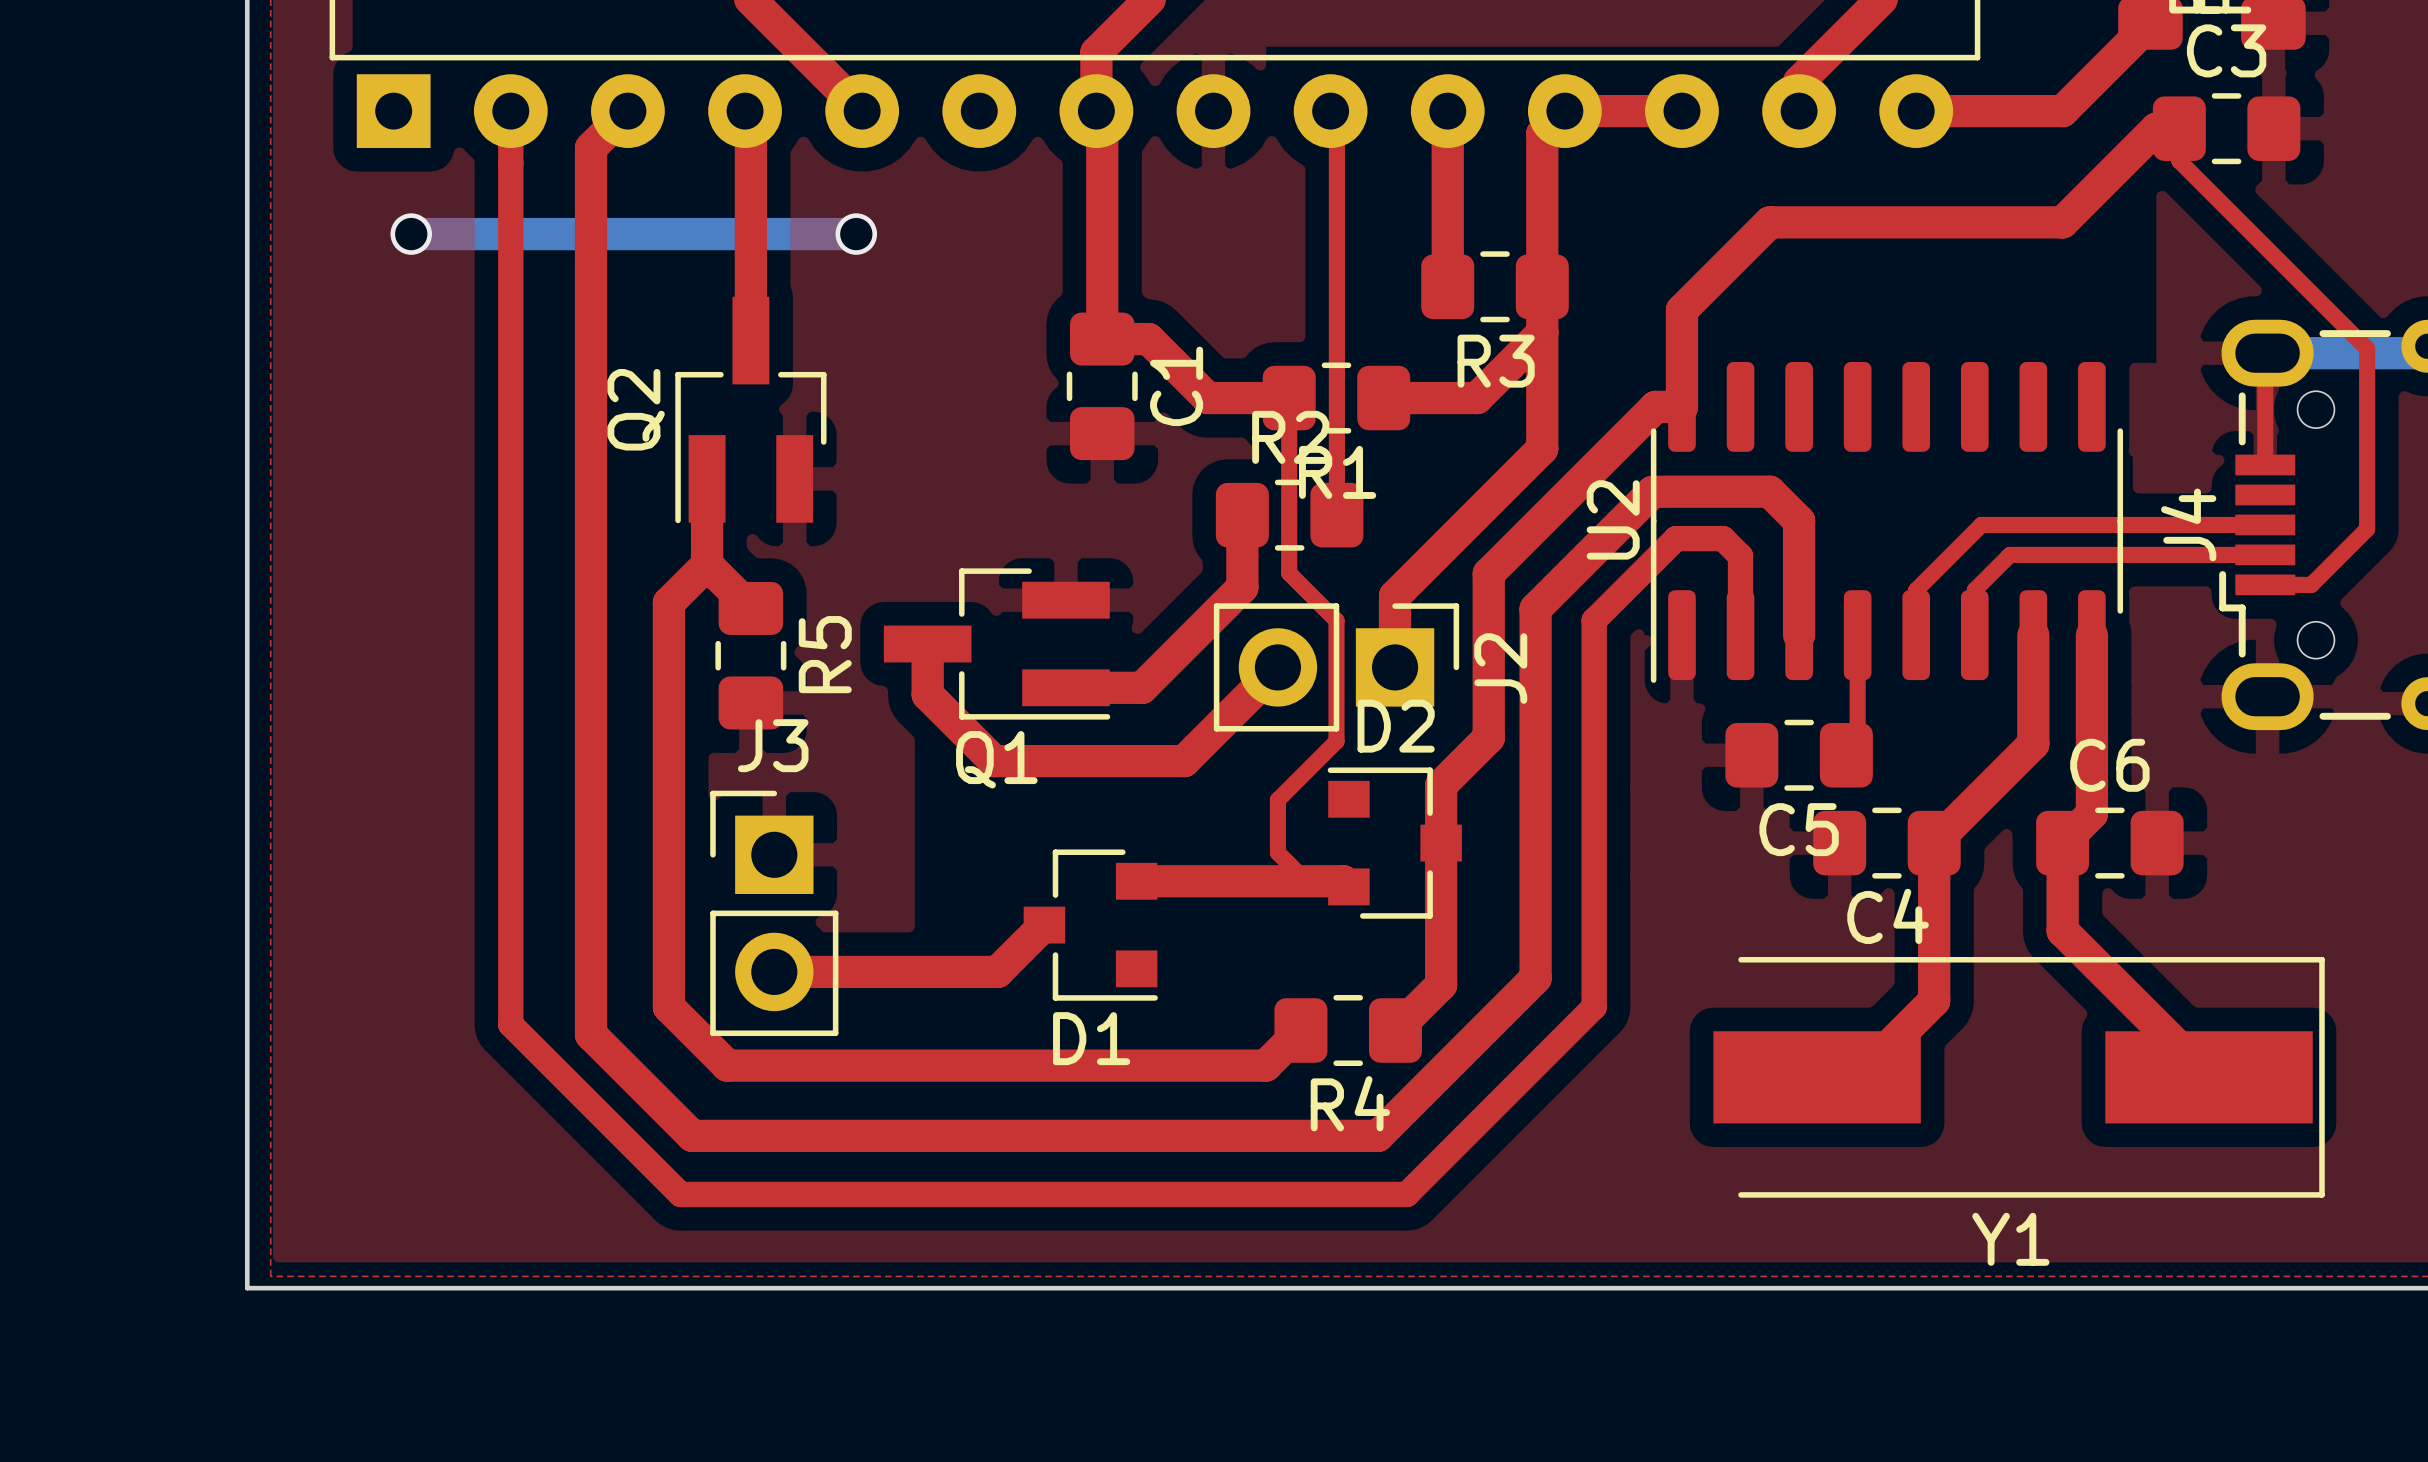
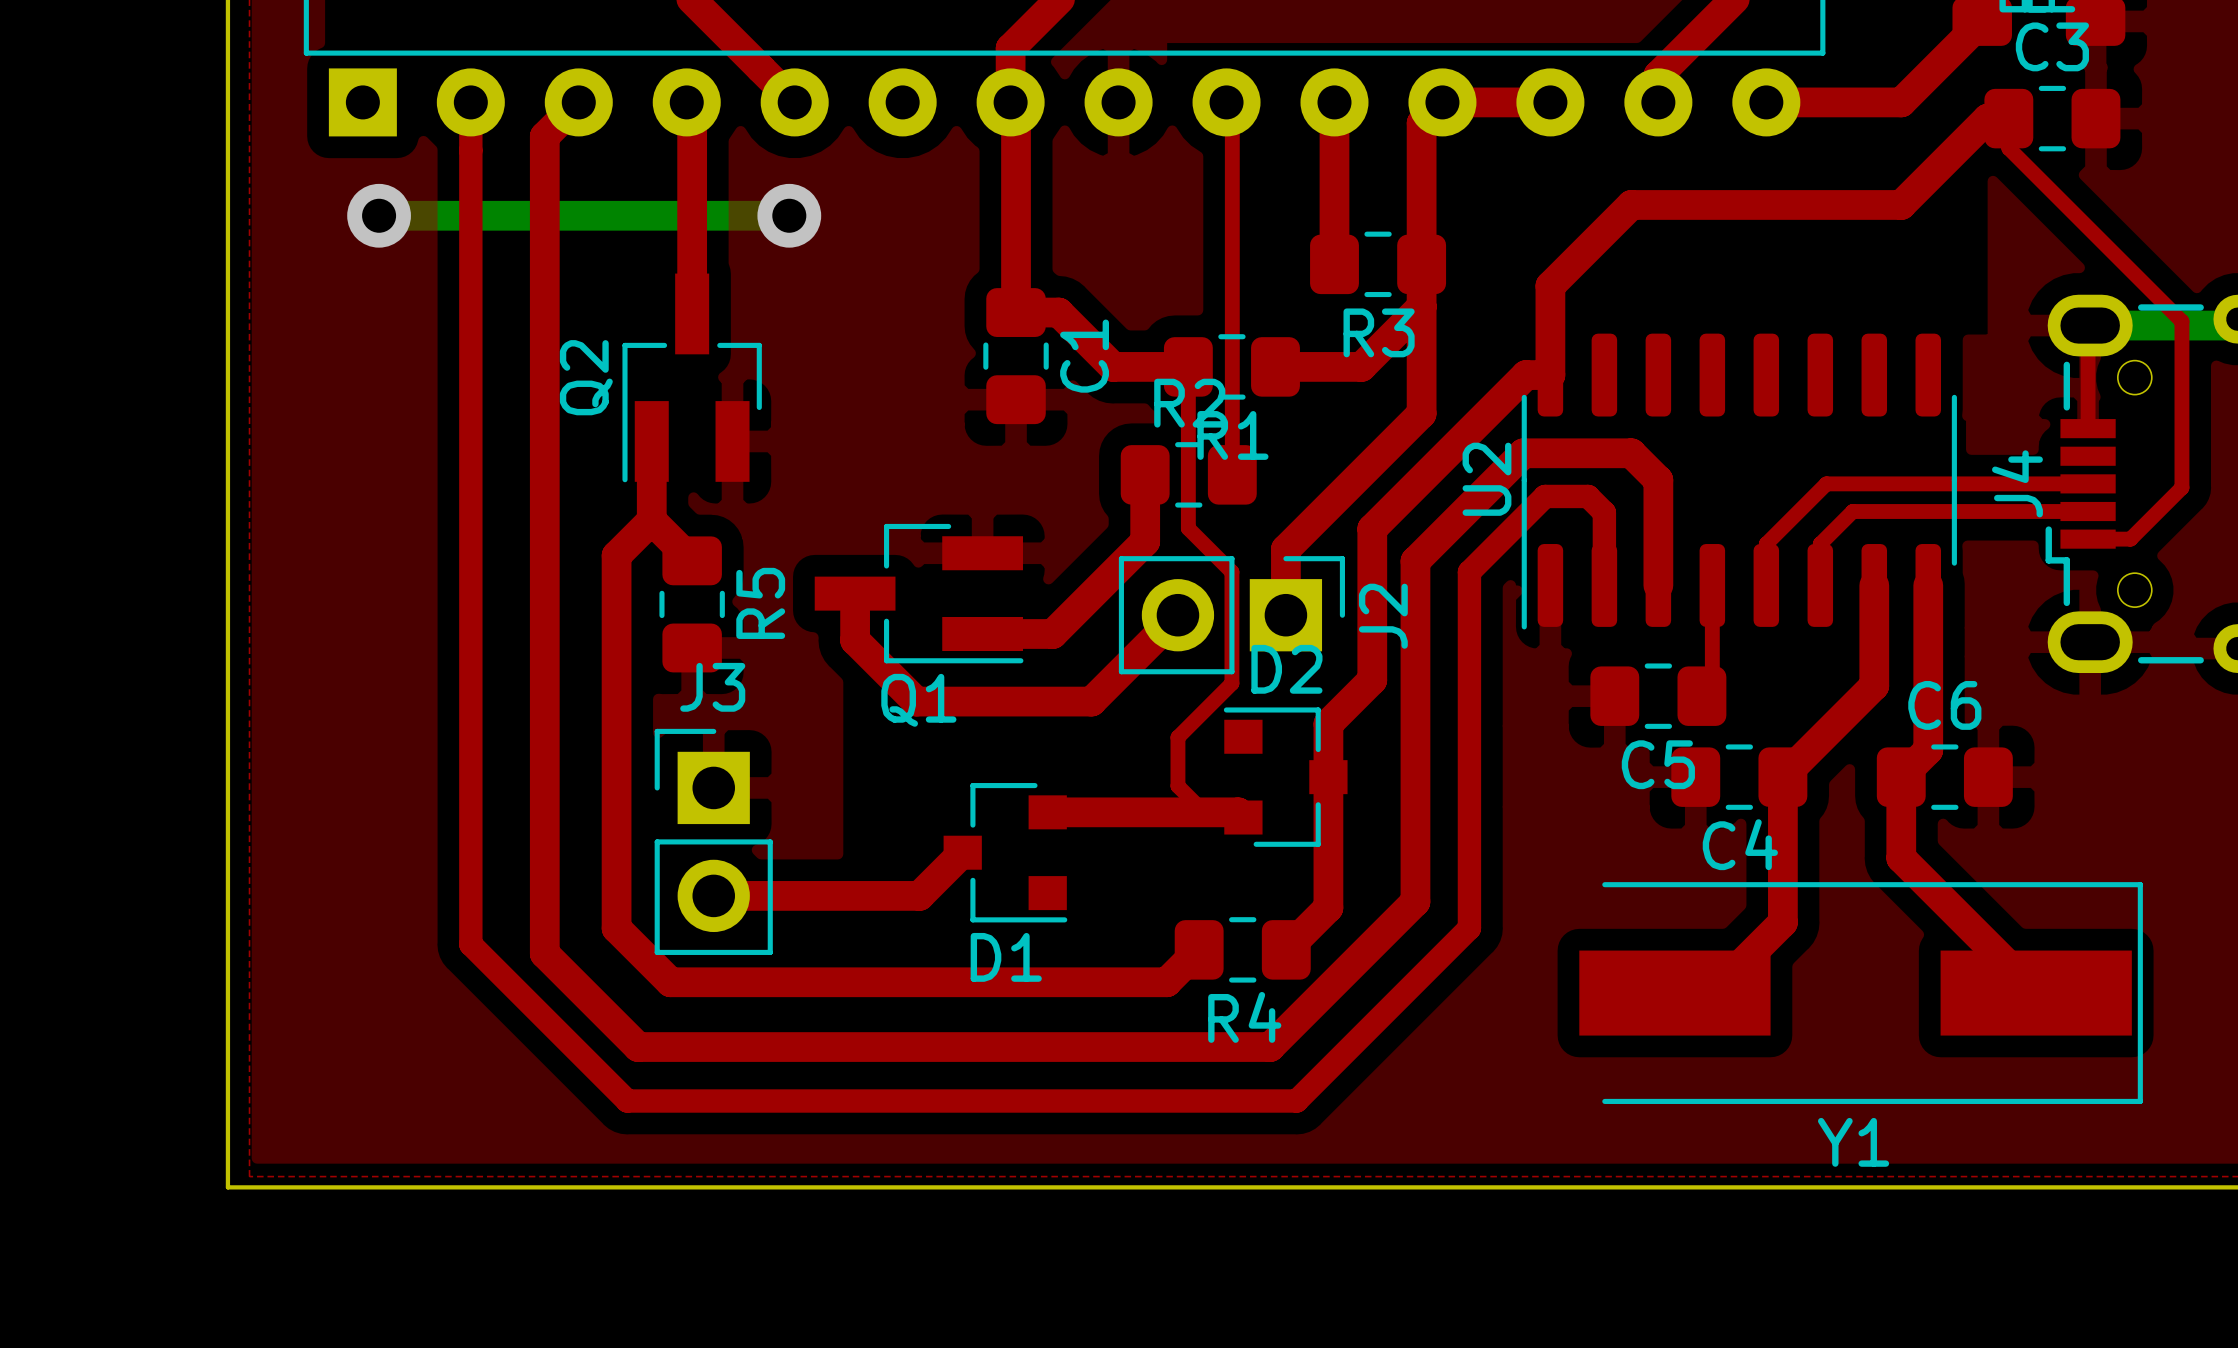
via size: [390, 213, 432, 255] -> [347, 183, 411, 248]
via size: [835, 213, 878, 255] -> [757, 183, 822, 248]

